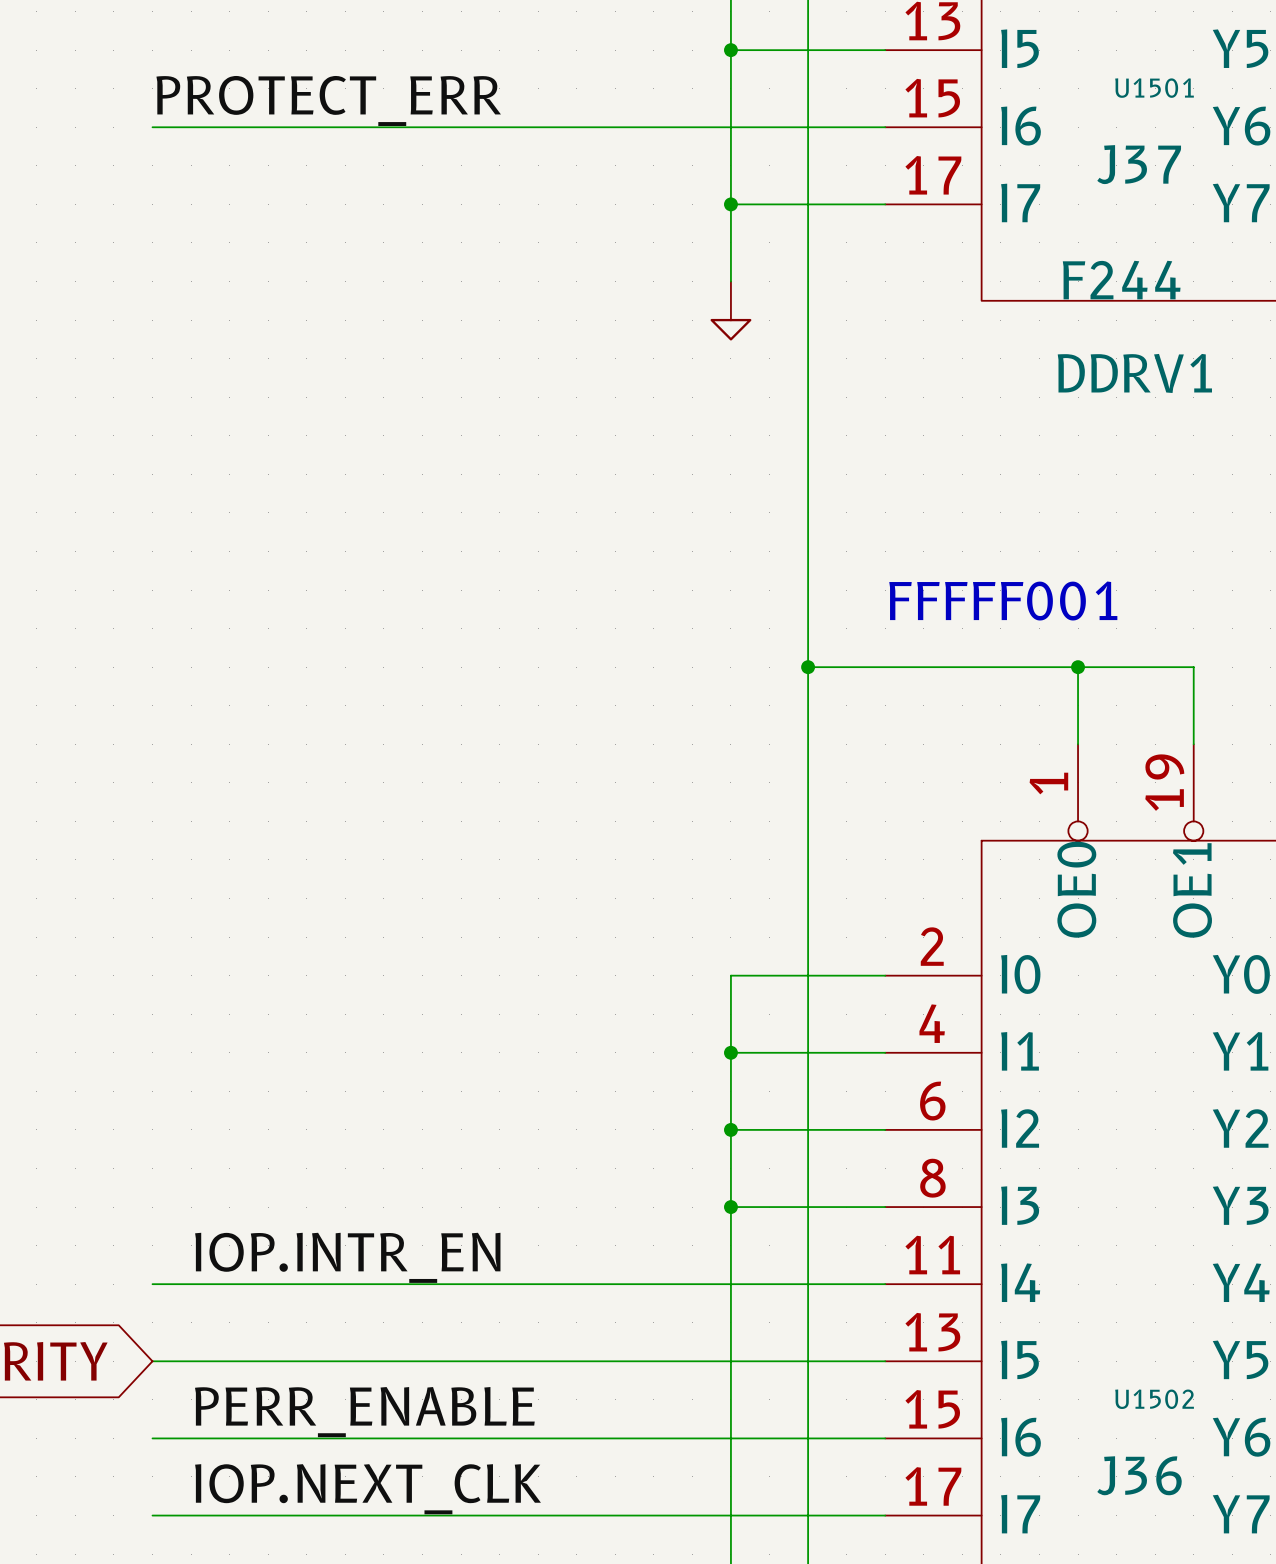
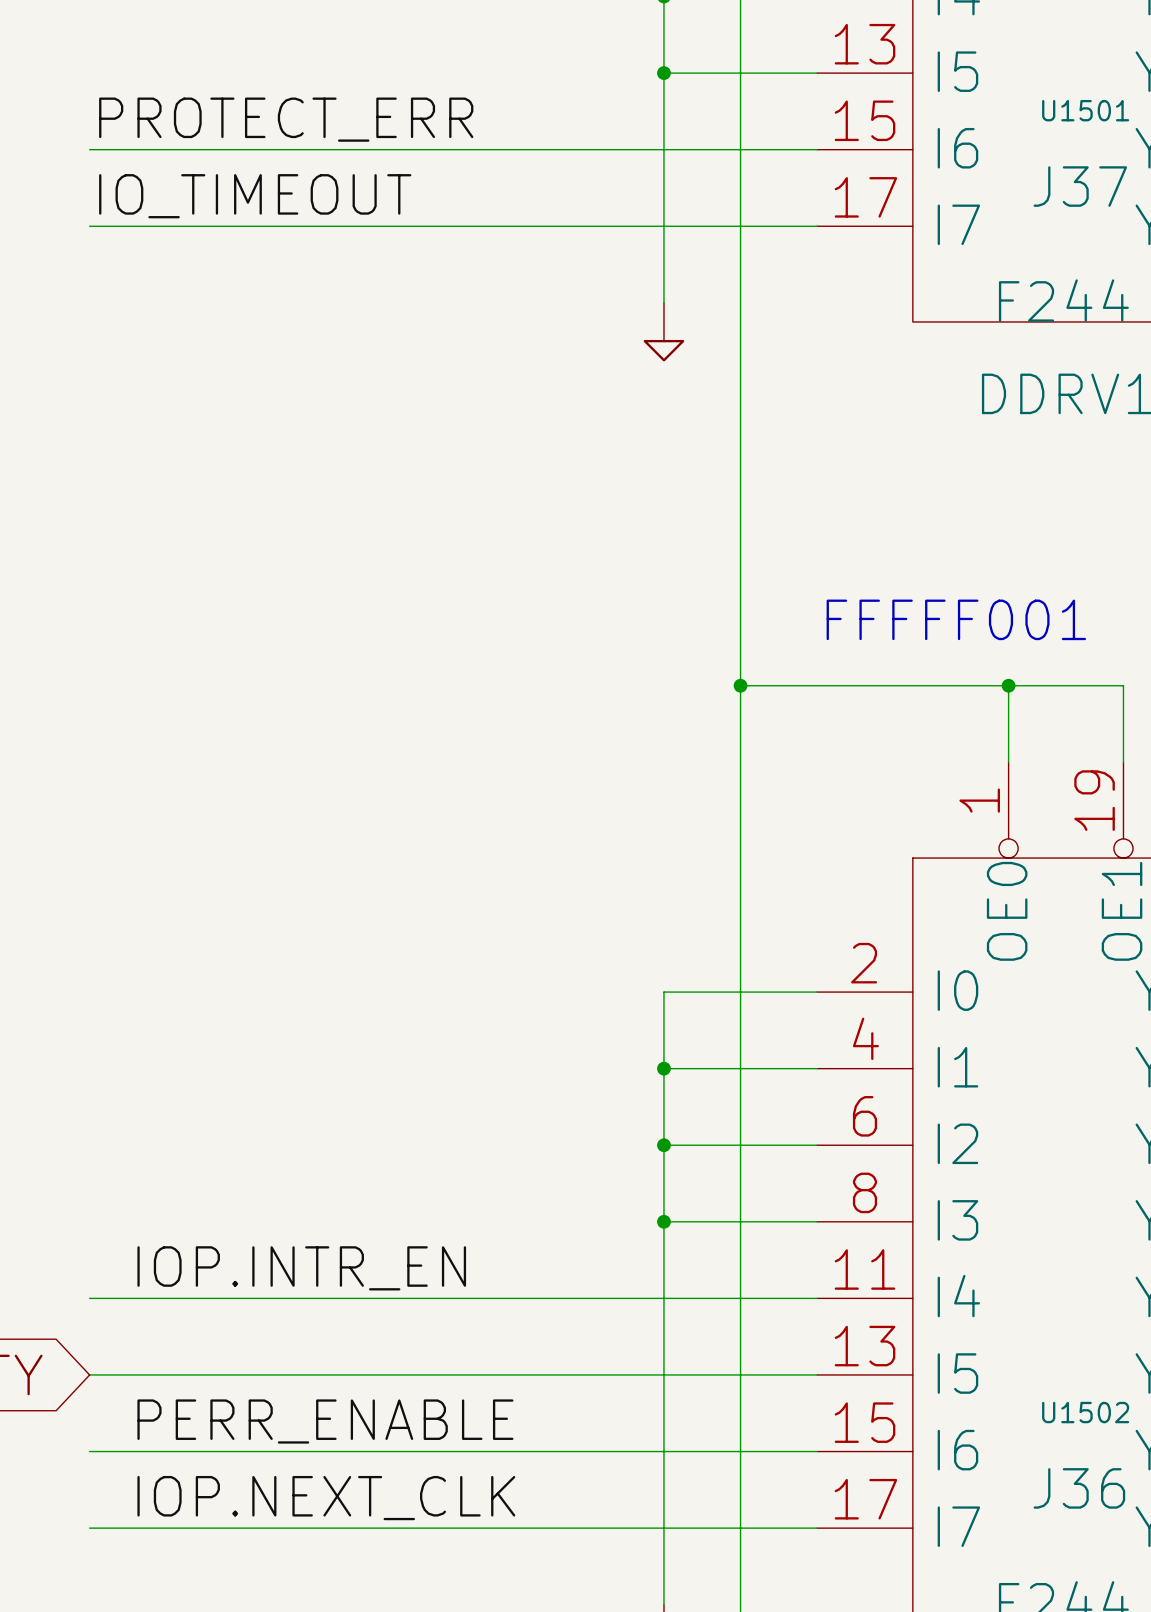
label: none -> IO_TIMEOUT (255, 196)
wire: none -> (89, 226) (663, 226)
junction: (730, 204) -> none

